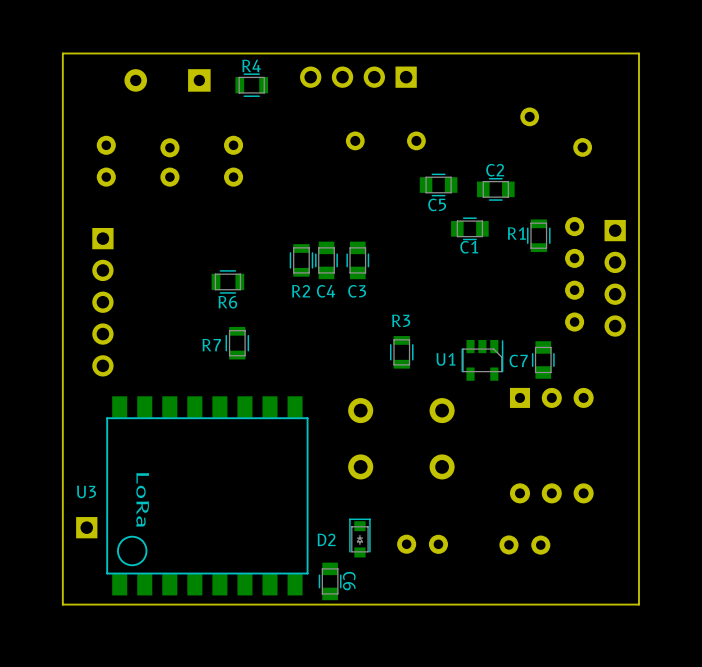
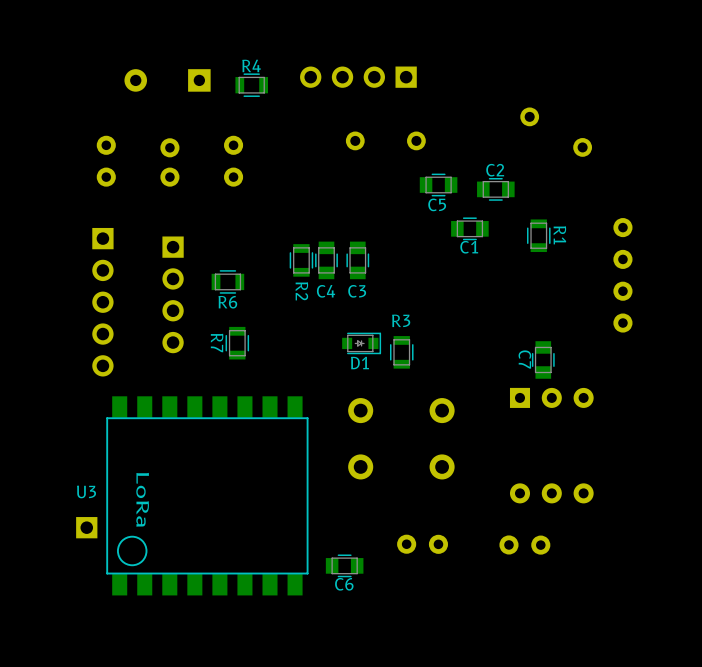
board edge: (638, 53) (62, 53) (62, 604) (638, 604) (638, 53) -> none
part footprint: [604, 219, 626, 337] -> [613, 218, 633, 333]
R1 name rotation: 0° (516, 233) -> 90° clockwise (559, 235)
R1 name position: R1 (516, 233) -> R1 (559, 235)
part: (574, 274) -> none
R2 name rotation: 0° (301, 291) -> 90° clockwise (301, 291)
part: none -> (173, 294)
D1: none -> (361, 343)
R7 name rotation: 0° (211, 345) -> 90° clockwise (217, 343)
U1: (482, 360) -> none
C7 name rotation: 0° (518, 360) -> 90° clockwise (524, 359)
D2: (359, 538) -> none
C6 rotation: 0° (330, 581) -> 90° clockwise (344, 565)

